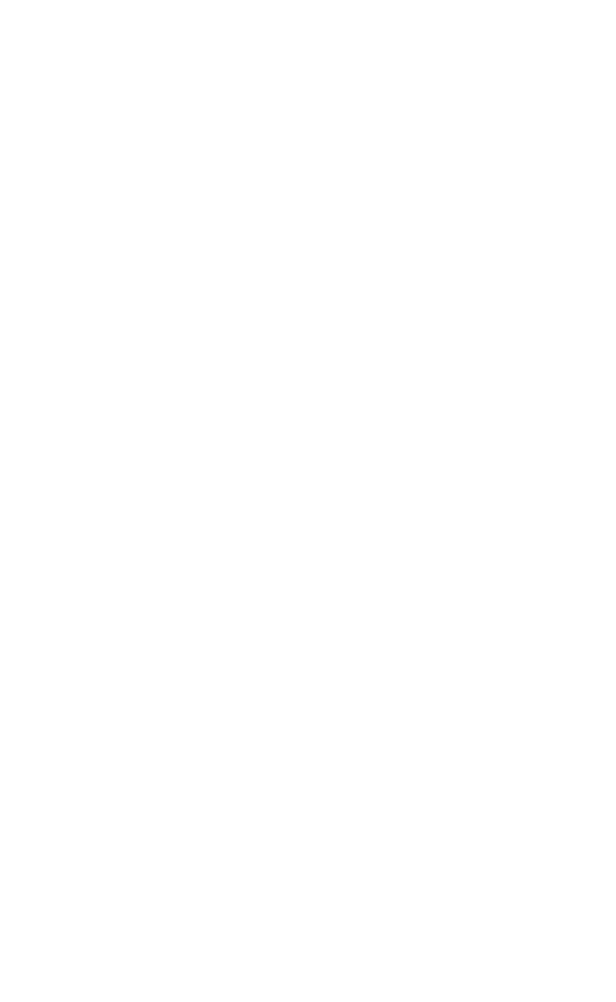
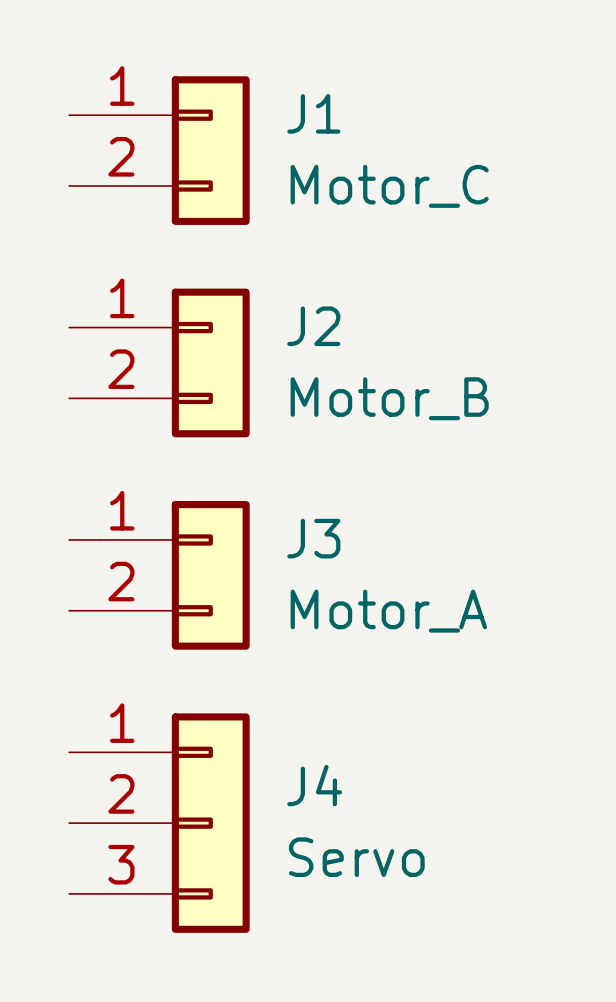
J1: none -> Motor_C (159, 150)
J2: none -> Motor_B (159, 362)
J3: none -> Motor_A (159, 575)
J4: none -> Servo (159, 823)

